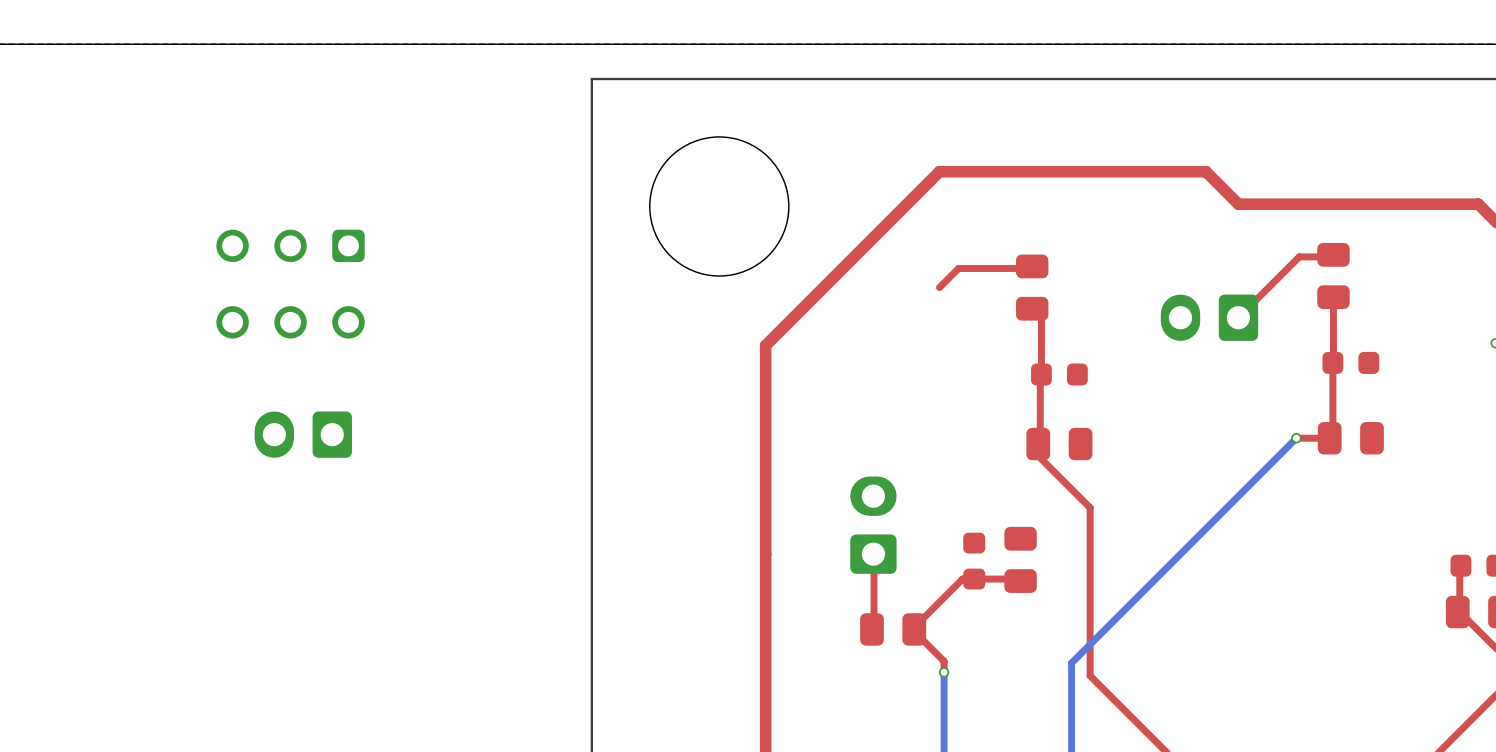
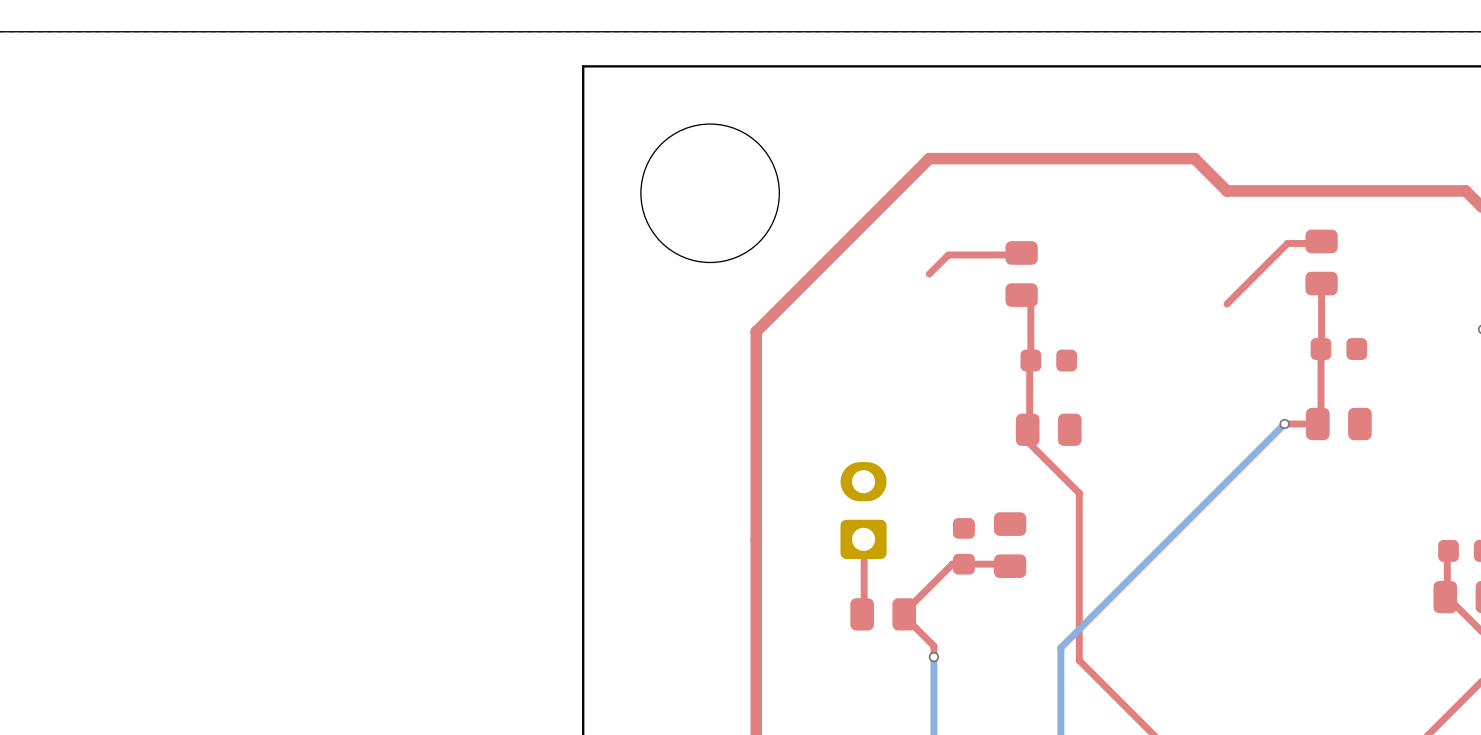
part: (290, 284) -> none
part: (1209, 317) -> none
part: (303, 434) -> none

